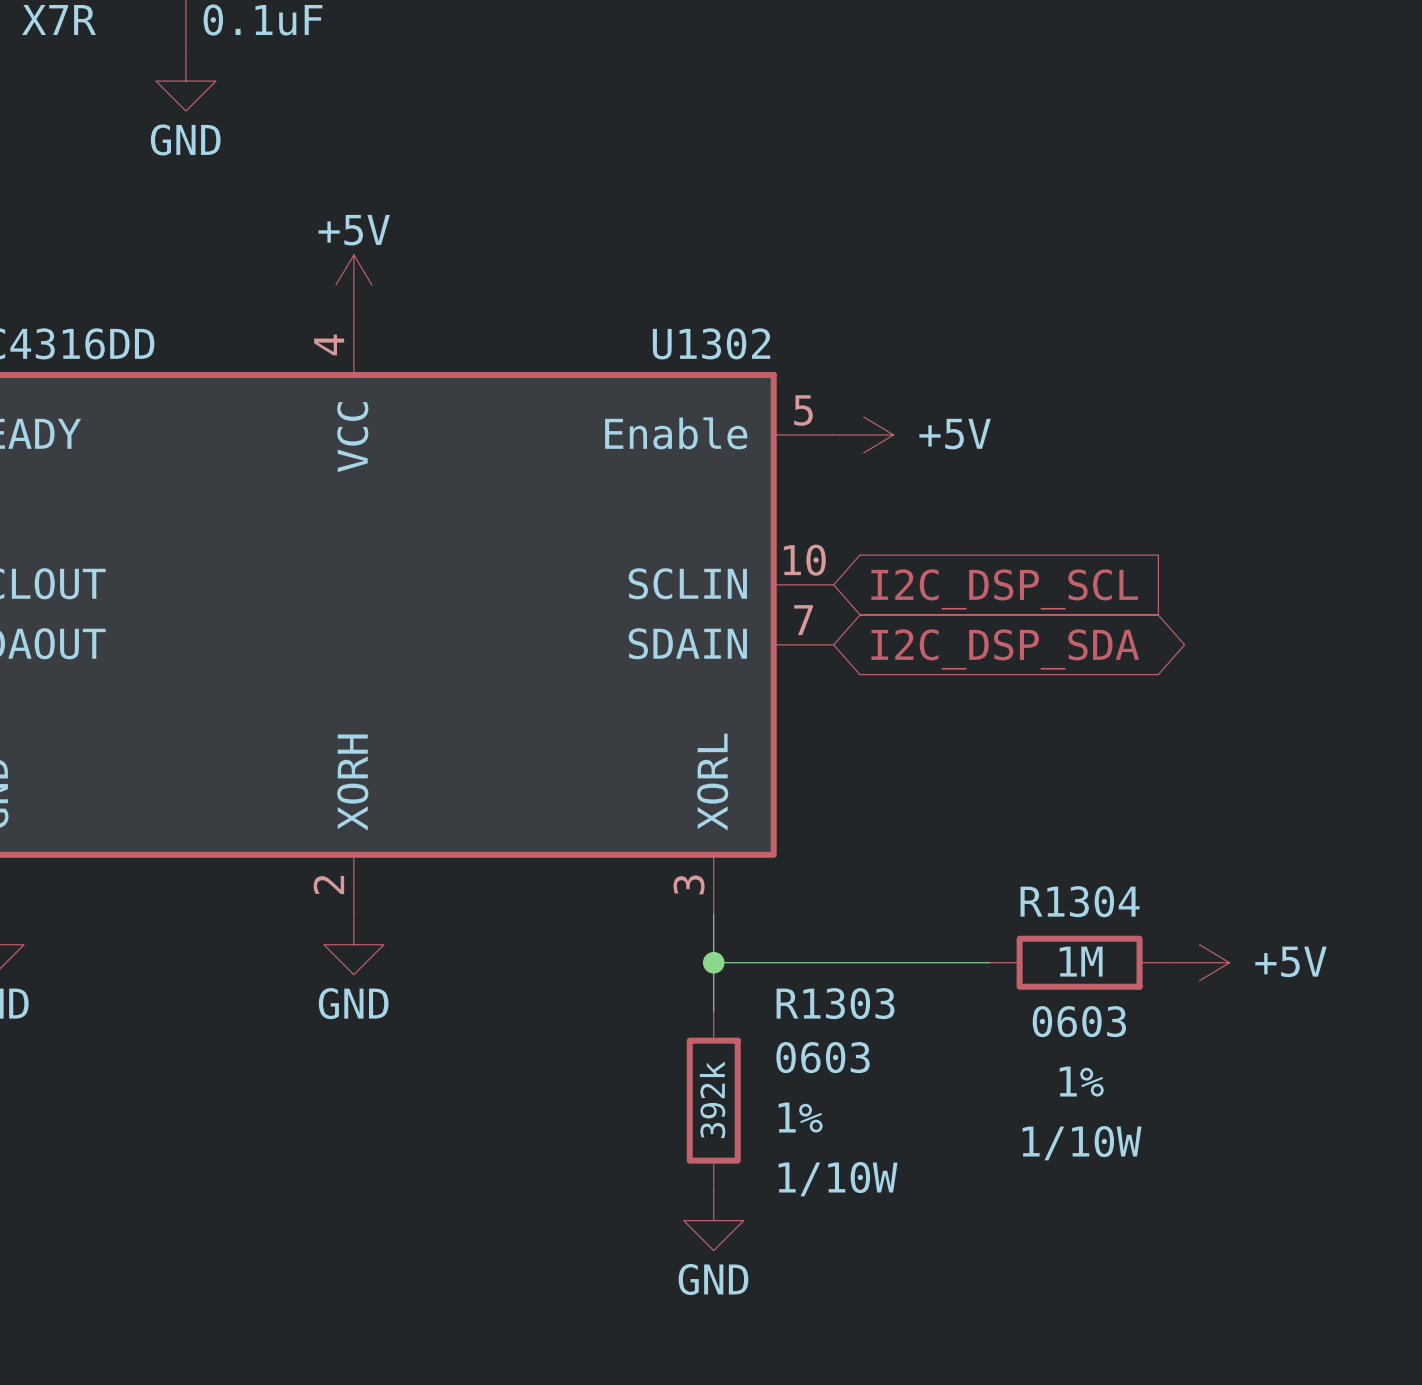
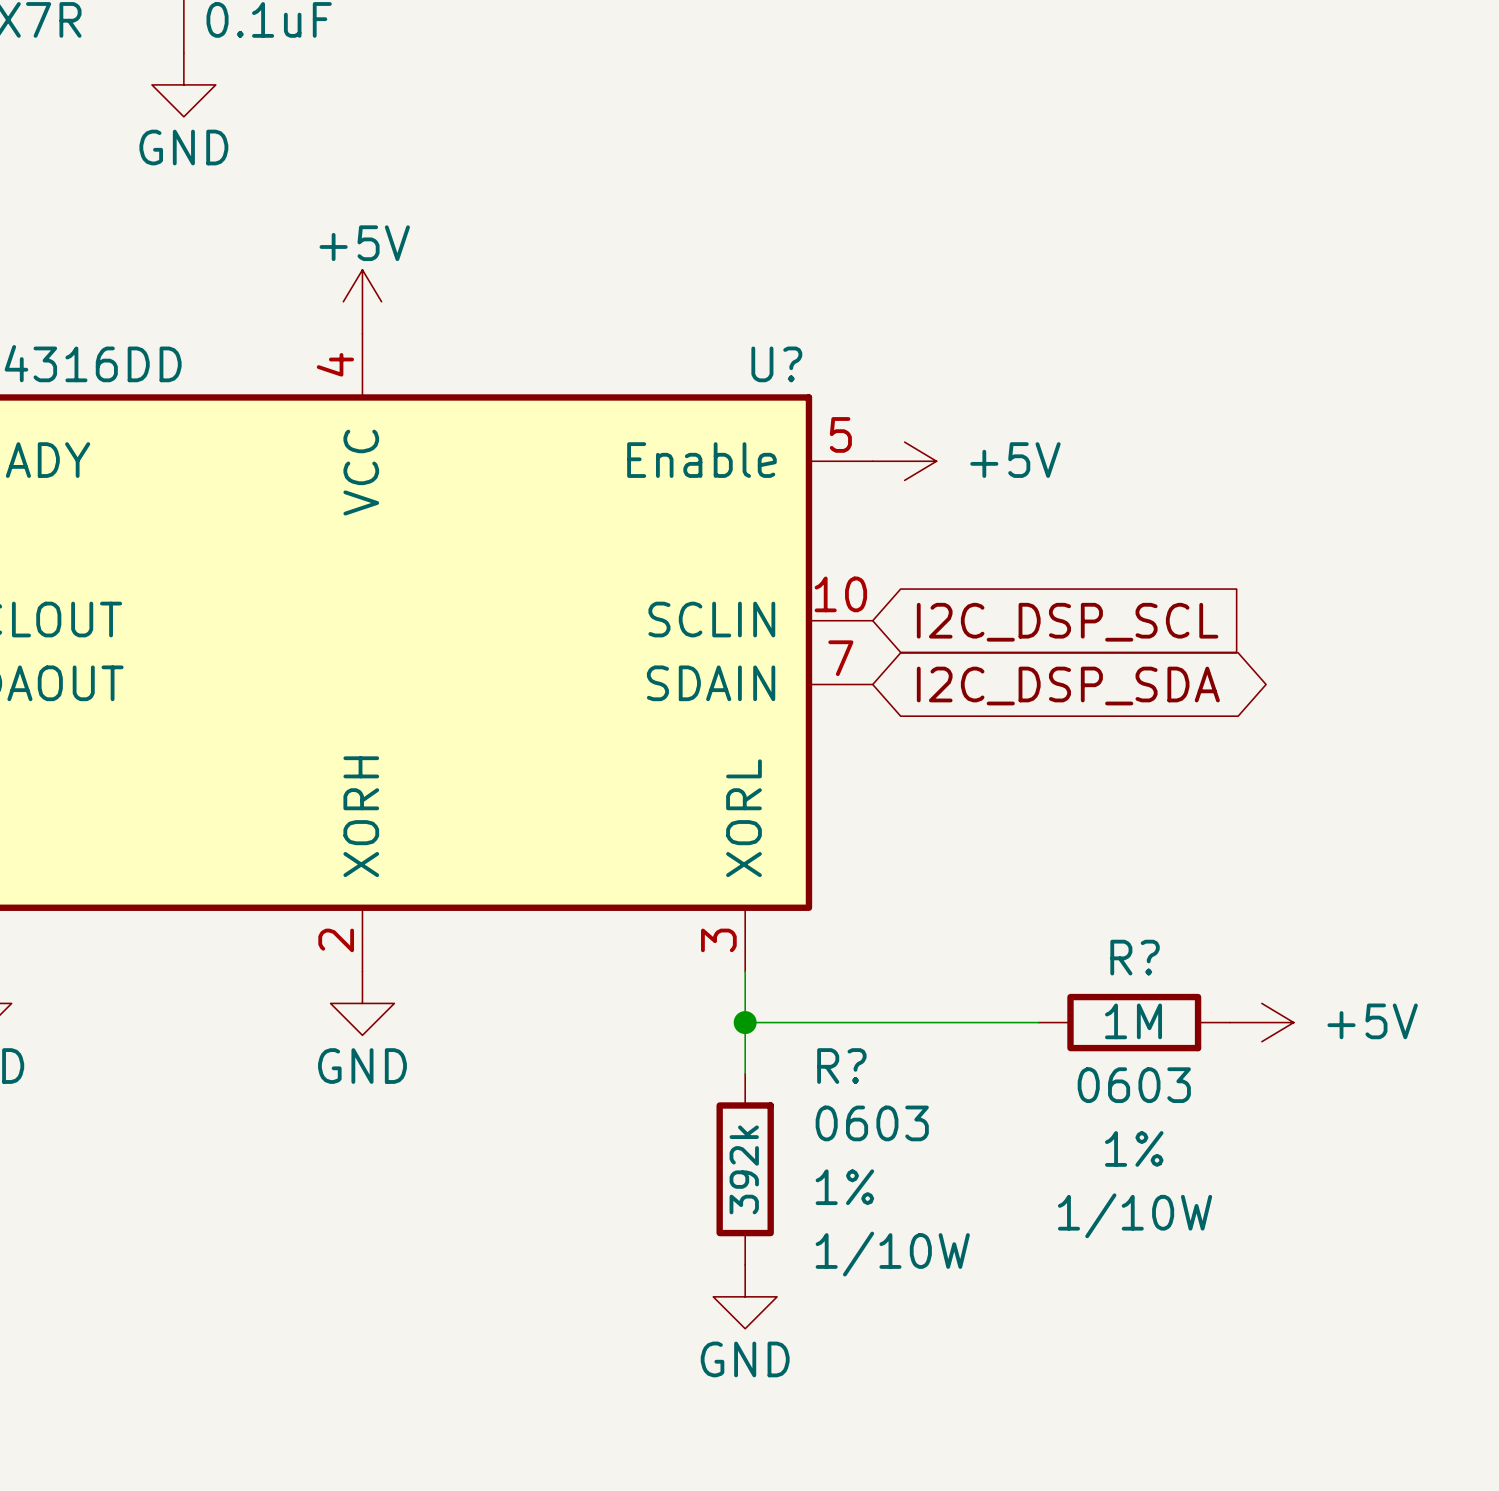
U1302 name: U1302 (711, 343) -> U? (776, 364)
R1304 name: R1304 (1080, 901) -> R? (1135, 957)
R1303 name: R1303 (835, 1003) -> R? (841, 1066)

